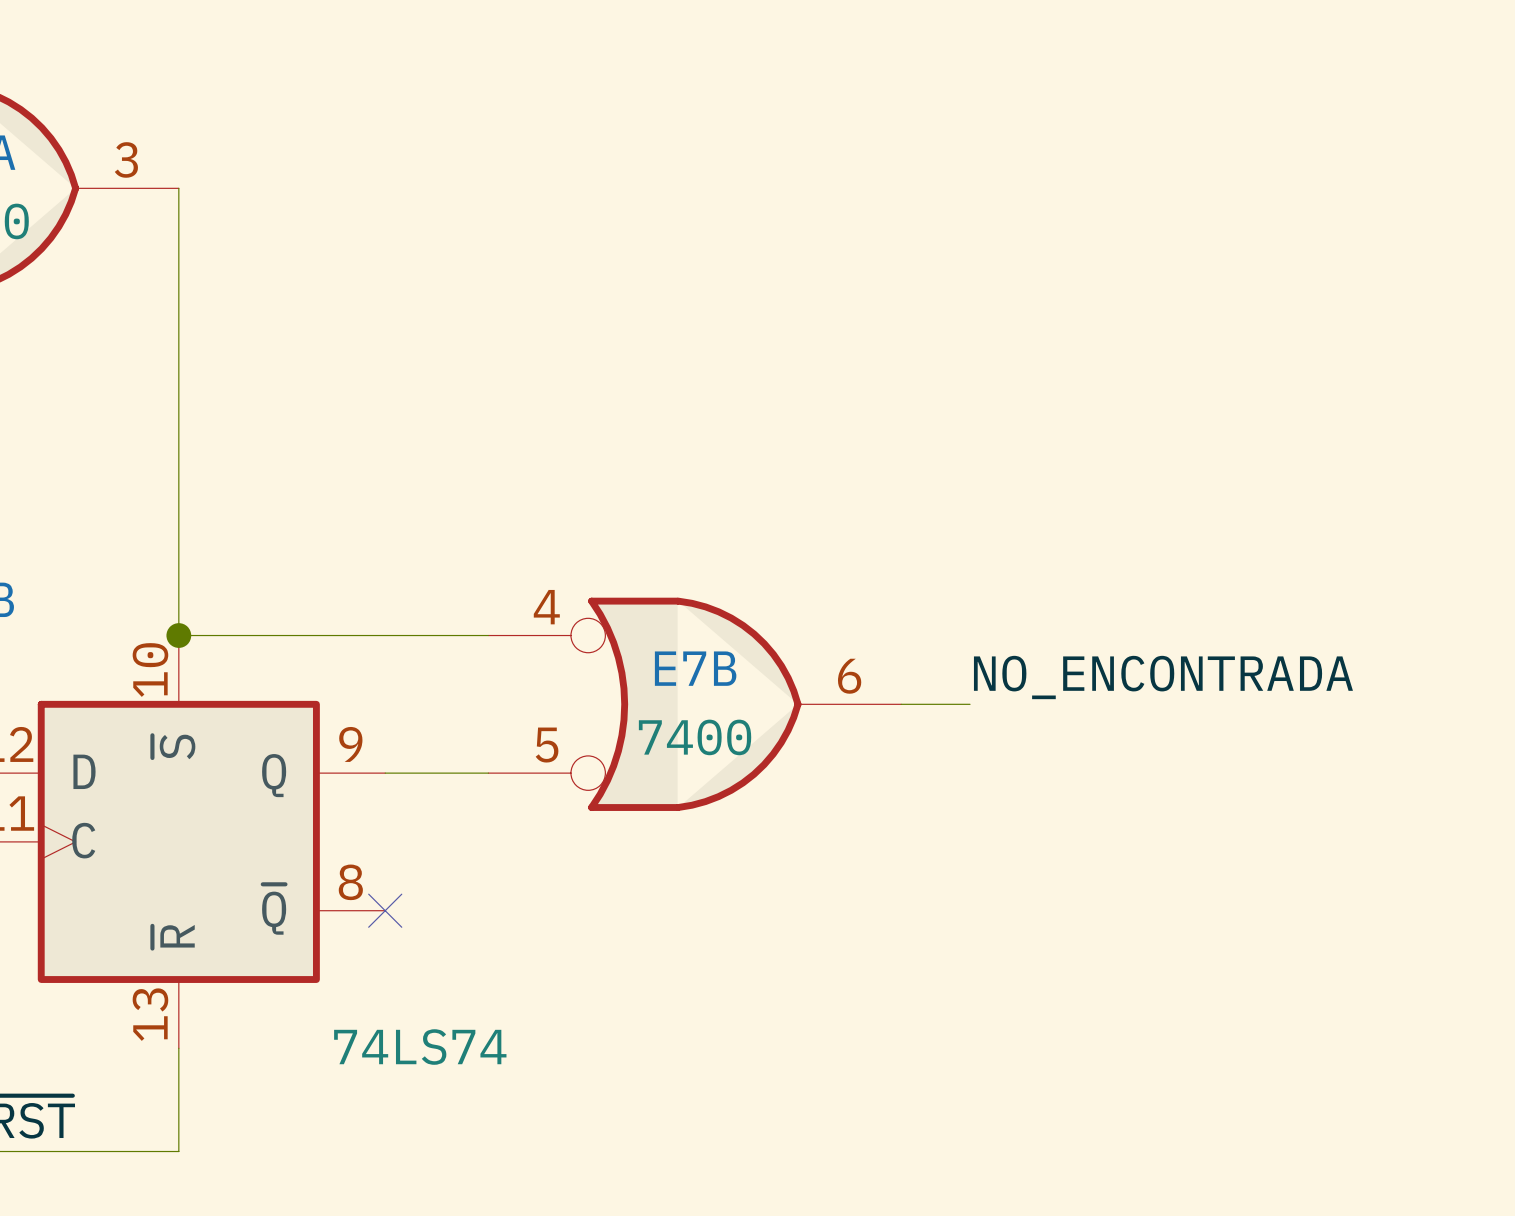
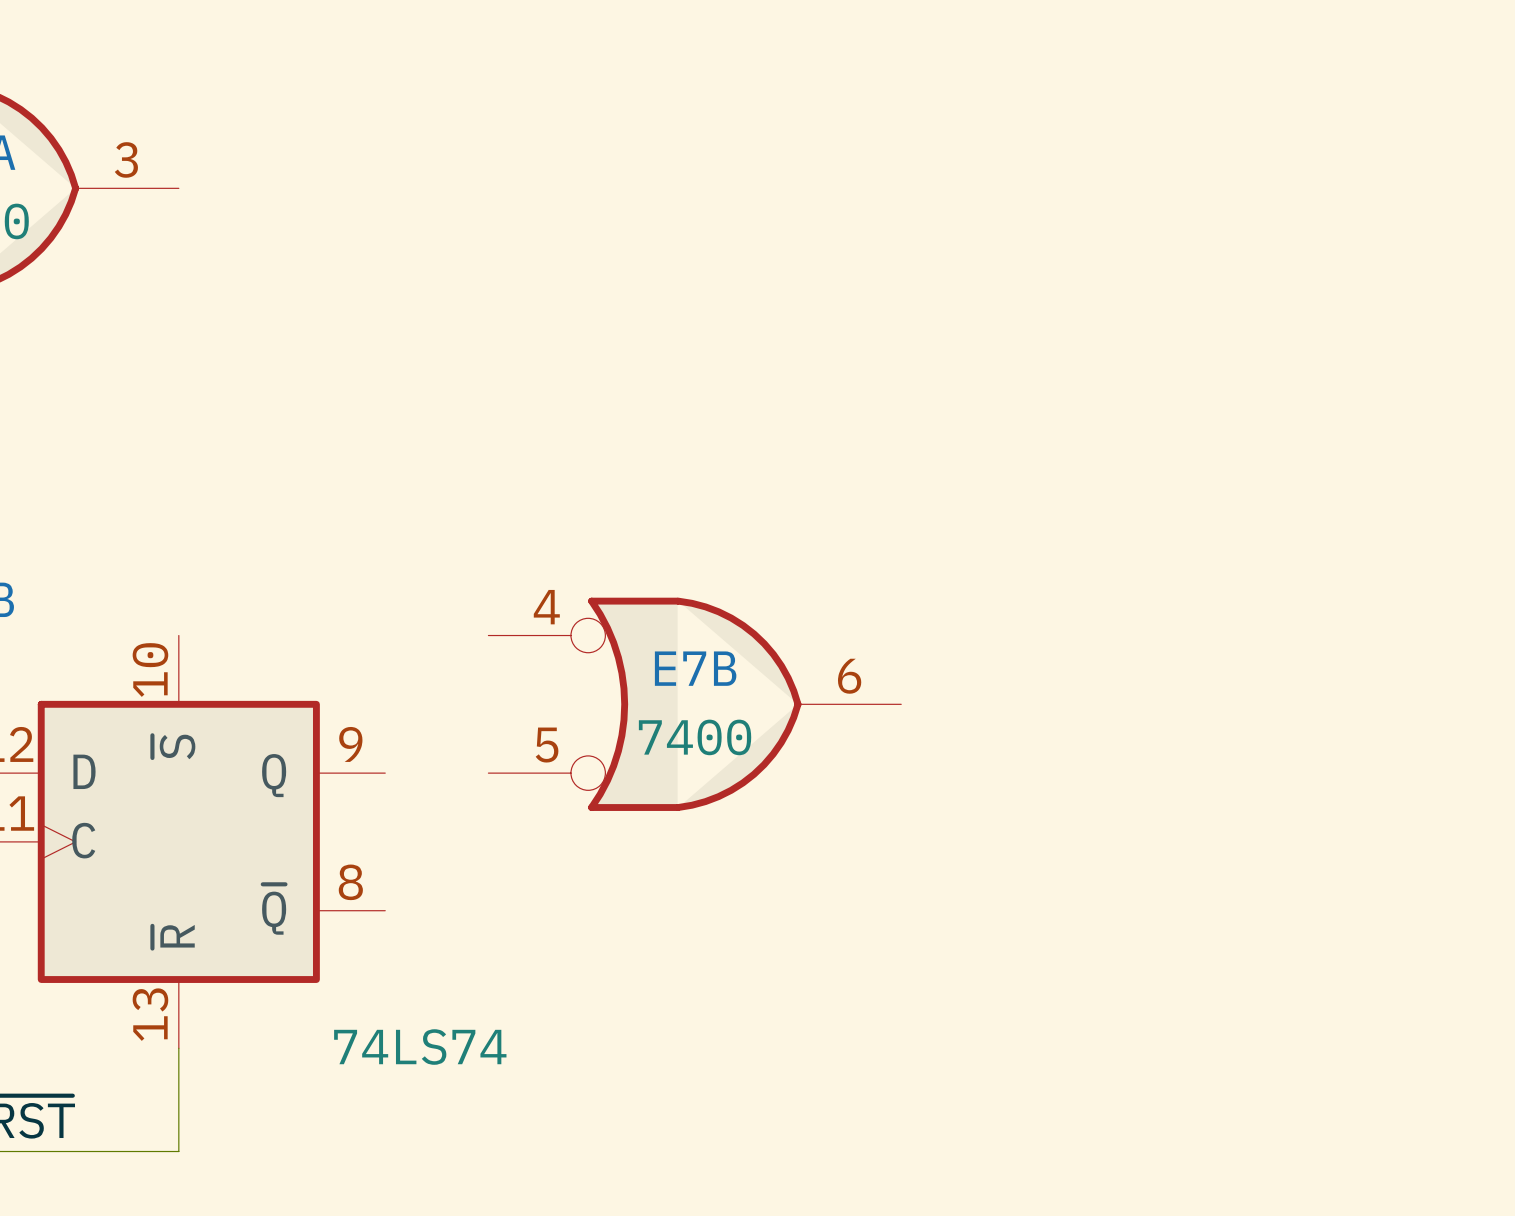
wire: (178, 188) (178, 635) (488, 635) -> none
junction: (178, 635) -> none
label: NO_ENCONTRADA (1163, 677) -> none
wire: (901, 704) (970, 704) -> none
wire: (385, 773) (488, 773) -> none
no-connect mark: (385, 910) -> none

